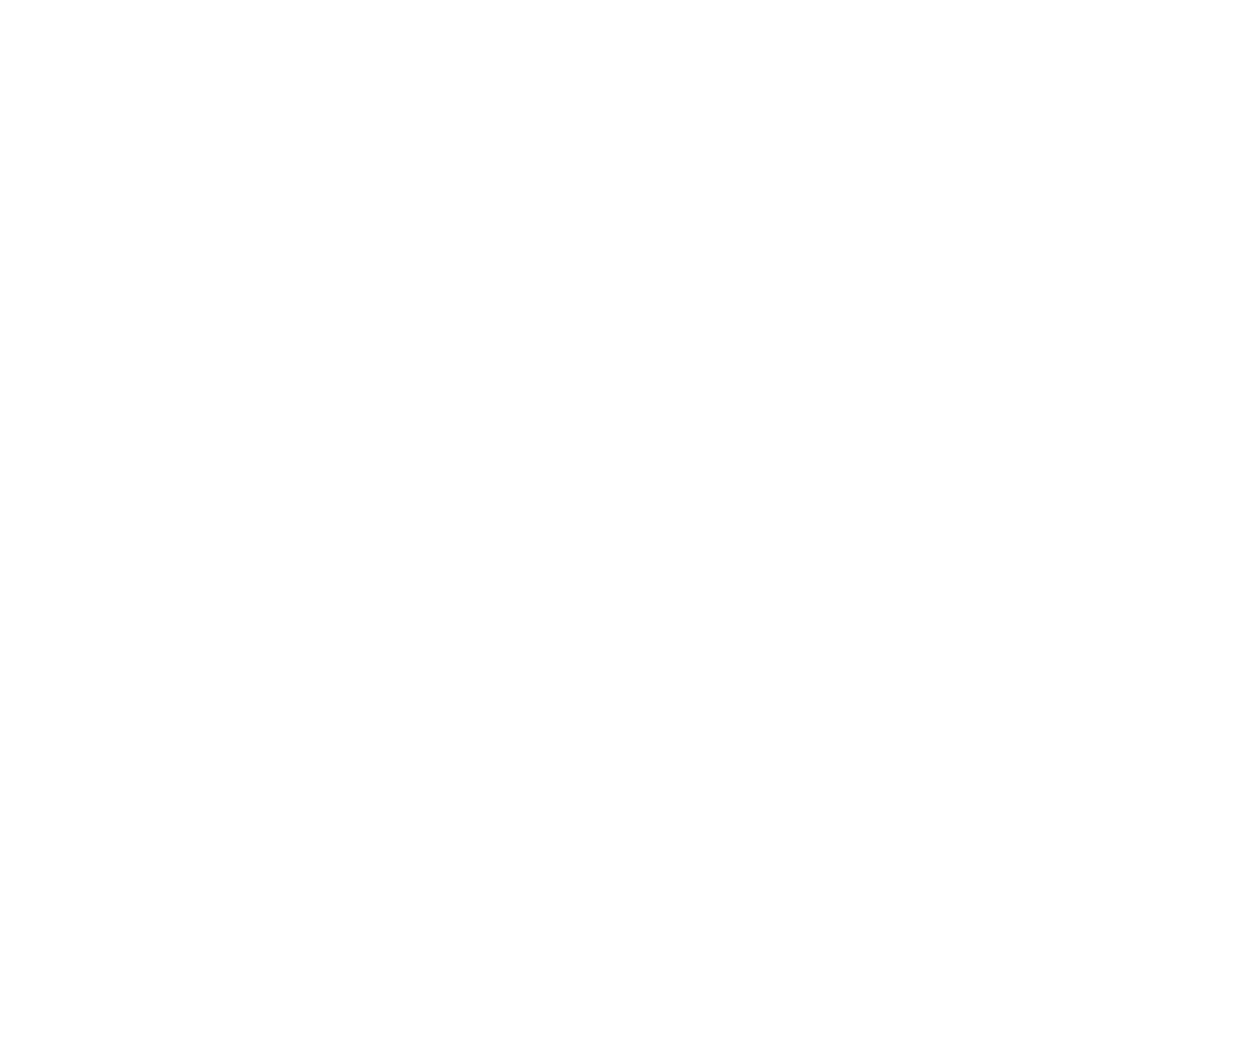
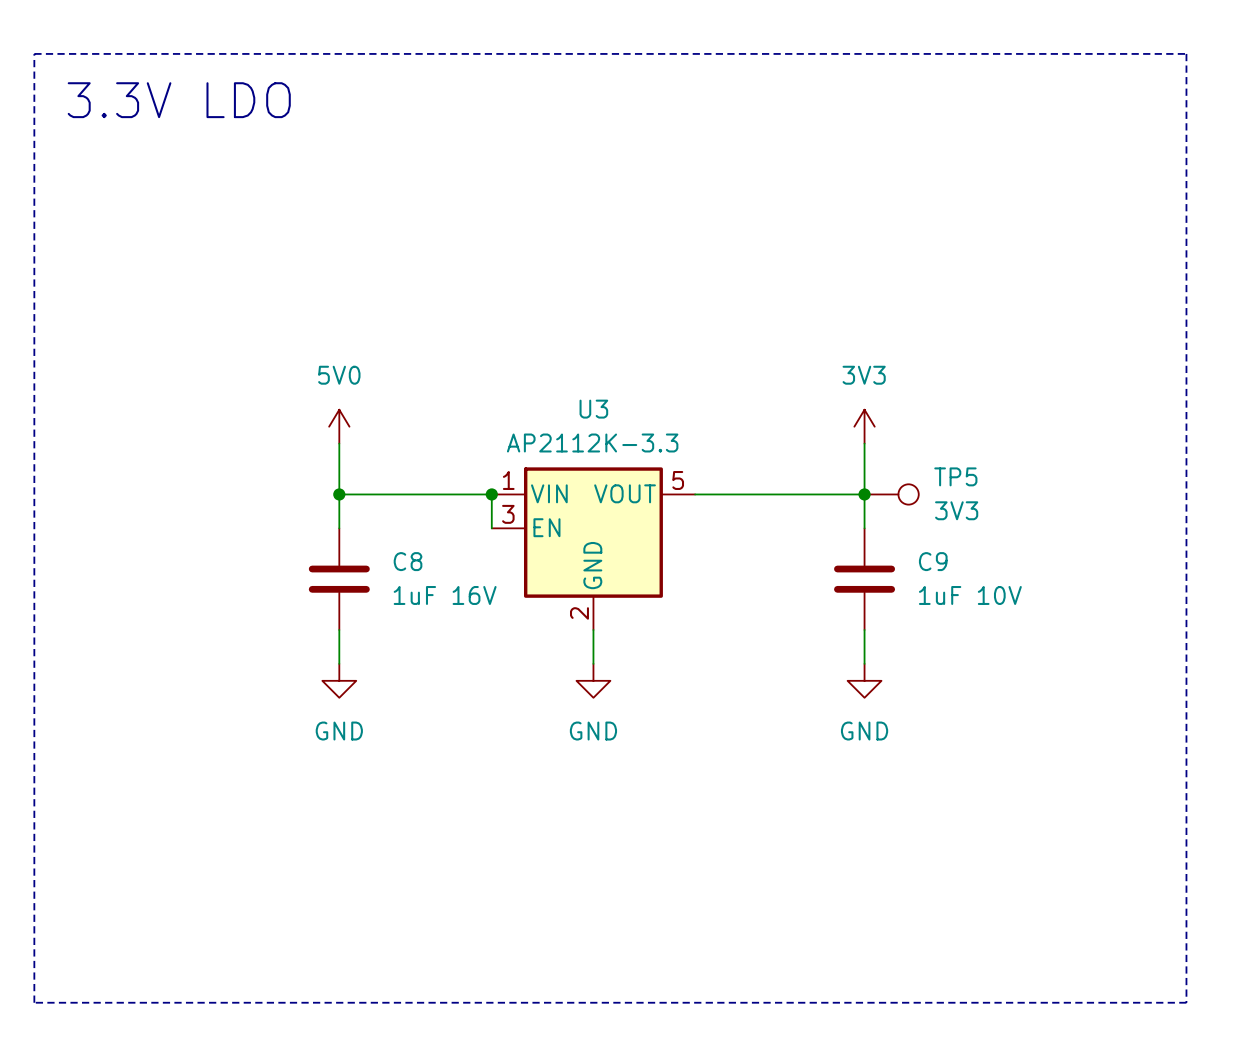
line: none -> (34, 53) (1186, 53) (1186, 1002) (34, 1002) (34, 53)
text: none -> 3.3V LDO (179, 100)
power symbol: none -> 5V0 (339, 426)
power symbol: none -> 3V3 (864, 426)
wire: none -> (339, 443) (339, 528)
wire: none -> (864, 443) (864, 528)
wire: none -> (339, 494) (491, 494) (491, 528)
junction: none -> (339, 494)
junction: none -> (491, 494)
wire: none -> (695, 494) (864, 494)
junction: none -> (864, 494)
TP5: none -> 3V3 (891, 494)
U3: none -> AP2112K-3.3 (593, 548)
C8: none -> 1uF 16V (339, 579)
C9: none -> 1uF 10V (864, 579)
wire: none -> (339, 630) (339, 663)
wire: none -> (593, 630) (593, 663)
wire: none -> (864, 630) (864, 663)
power symbol: none -> GND (339, 680)
power symbol: none -> GND (593, 680)
power symbol: none -> GND (864, 680)

